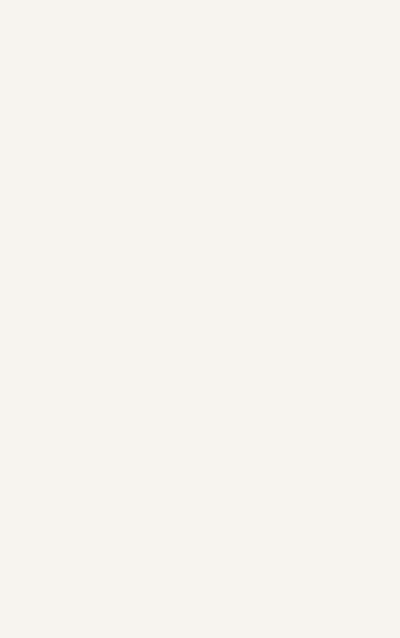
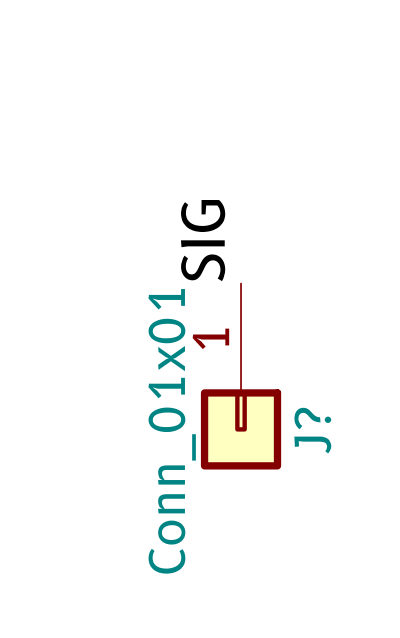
label: none -> SIG (203, 240)
J?: none -> Conn_01x01 (241, 376)

